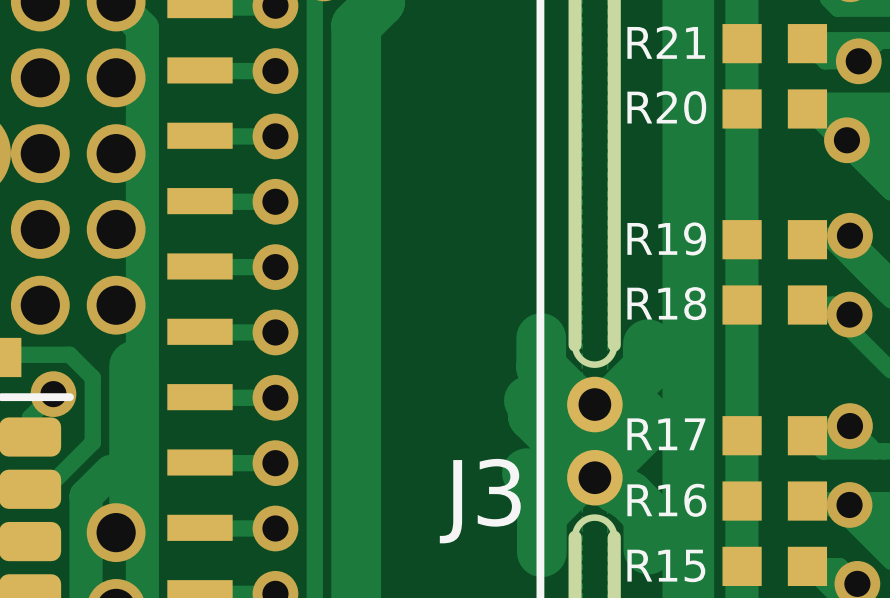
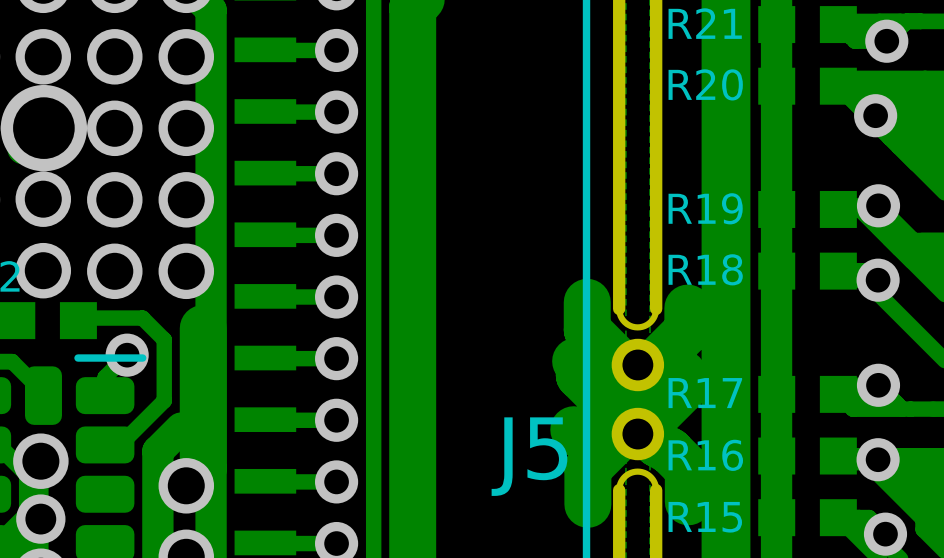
J3 name: J3 (480, 501) -> J5 (529, 456)

